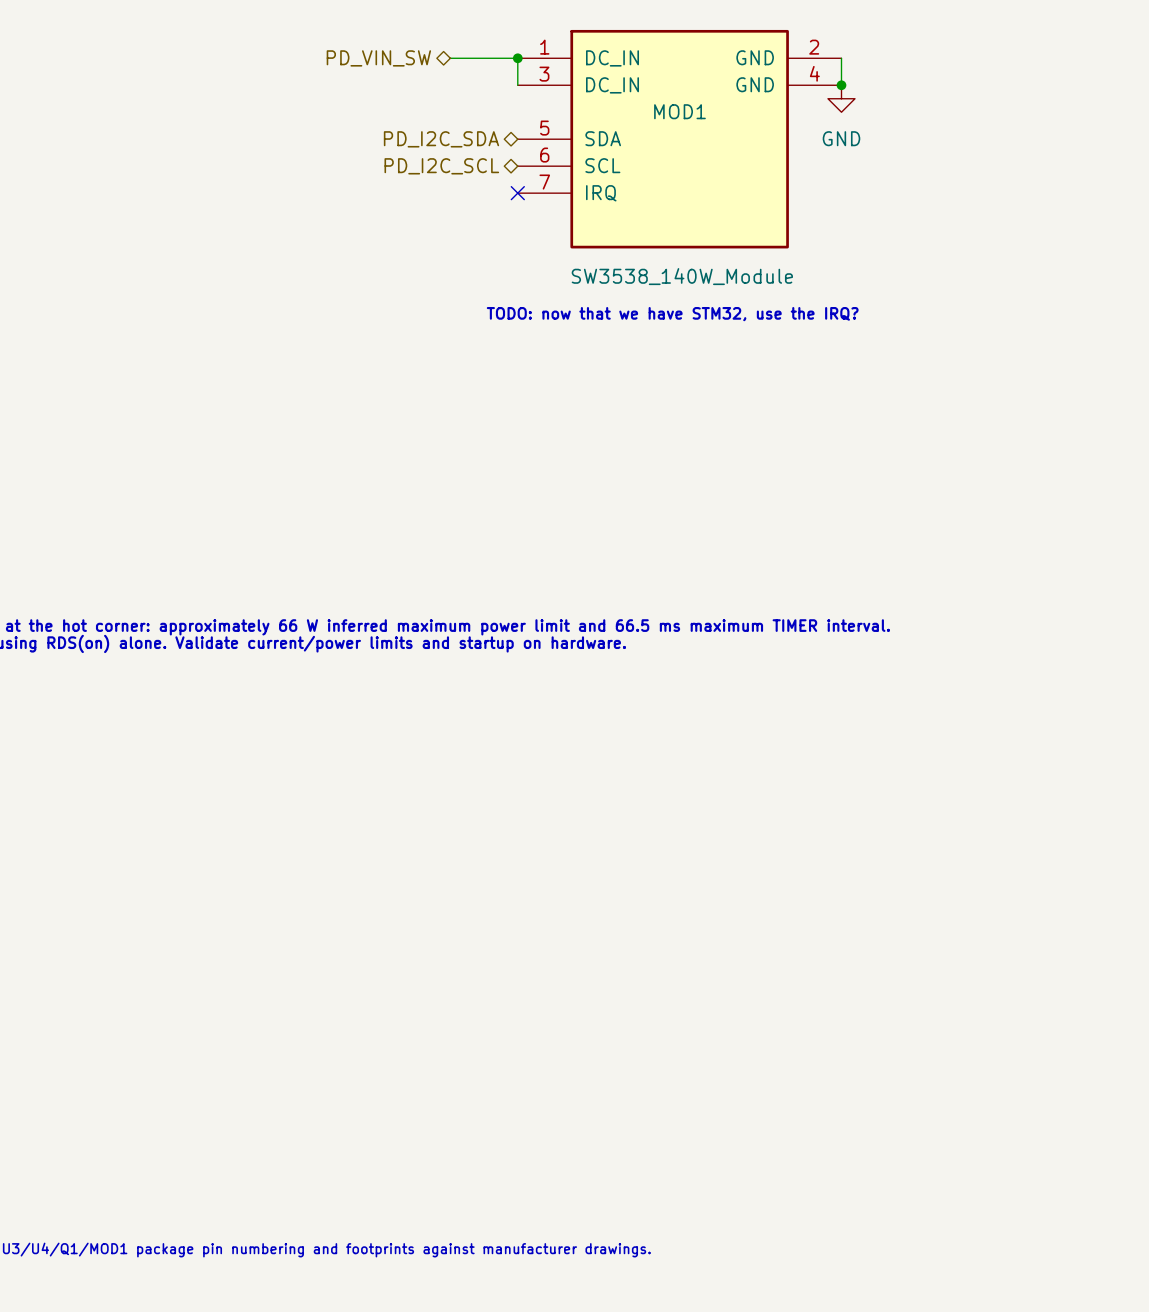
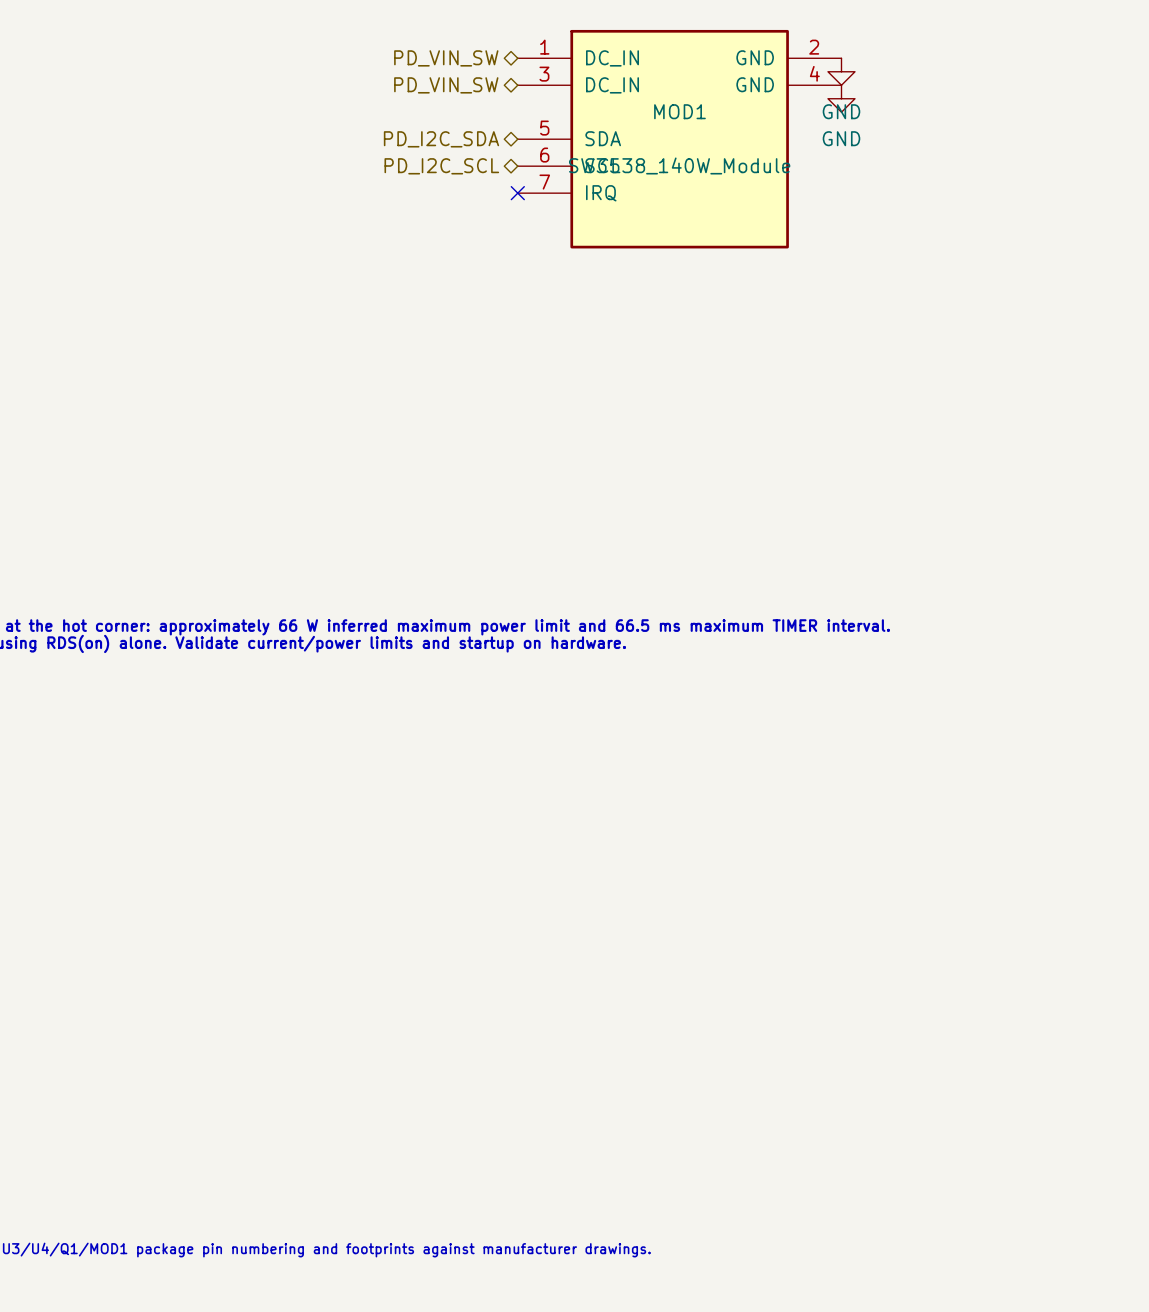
hierarchical label: PD_VIN_SW (378, 58) -> none
hierarchical label: none -> PD_VIN_SW (446, 58)
wire: (450, 58) (517, 58) (517, 85) -> none
junction: (517, 58) -> none
power symbol: none -> GND (841, 71)
hierarchical label: none -> PD_VIN_SW (446, 85)
junction: (841, 85) -> none
MOD1 value position: SW3538_140W_Module (682, 276) -> SW3538_140W_Module (679, 165)
text: TODO: now that we have STM32, use the IRQ? (672, 314) -> none

